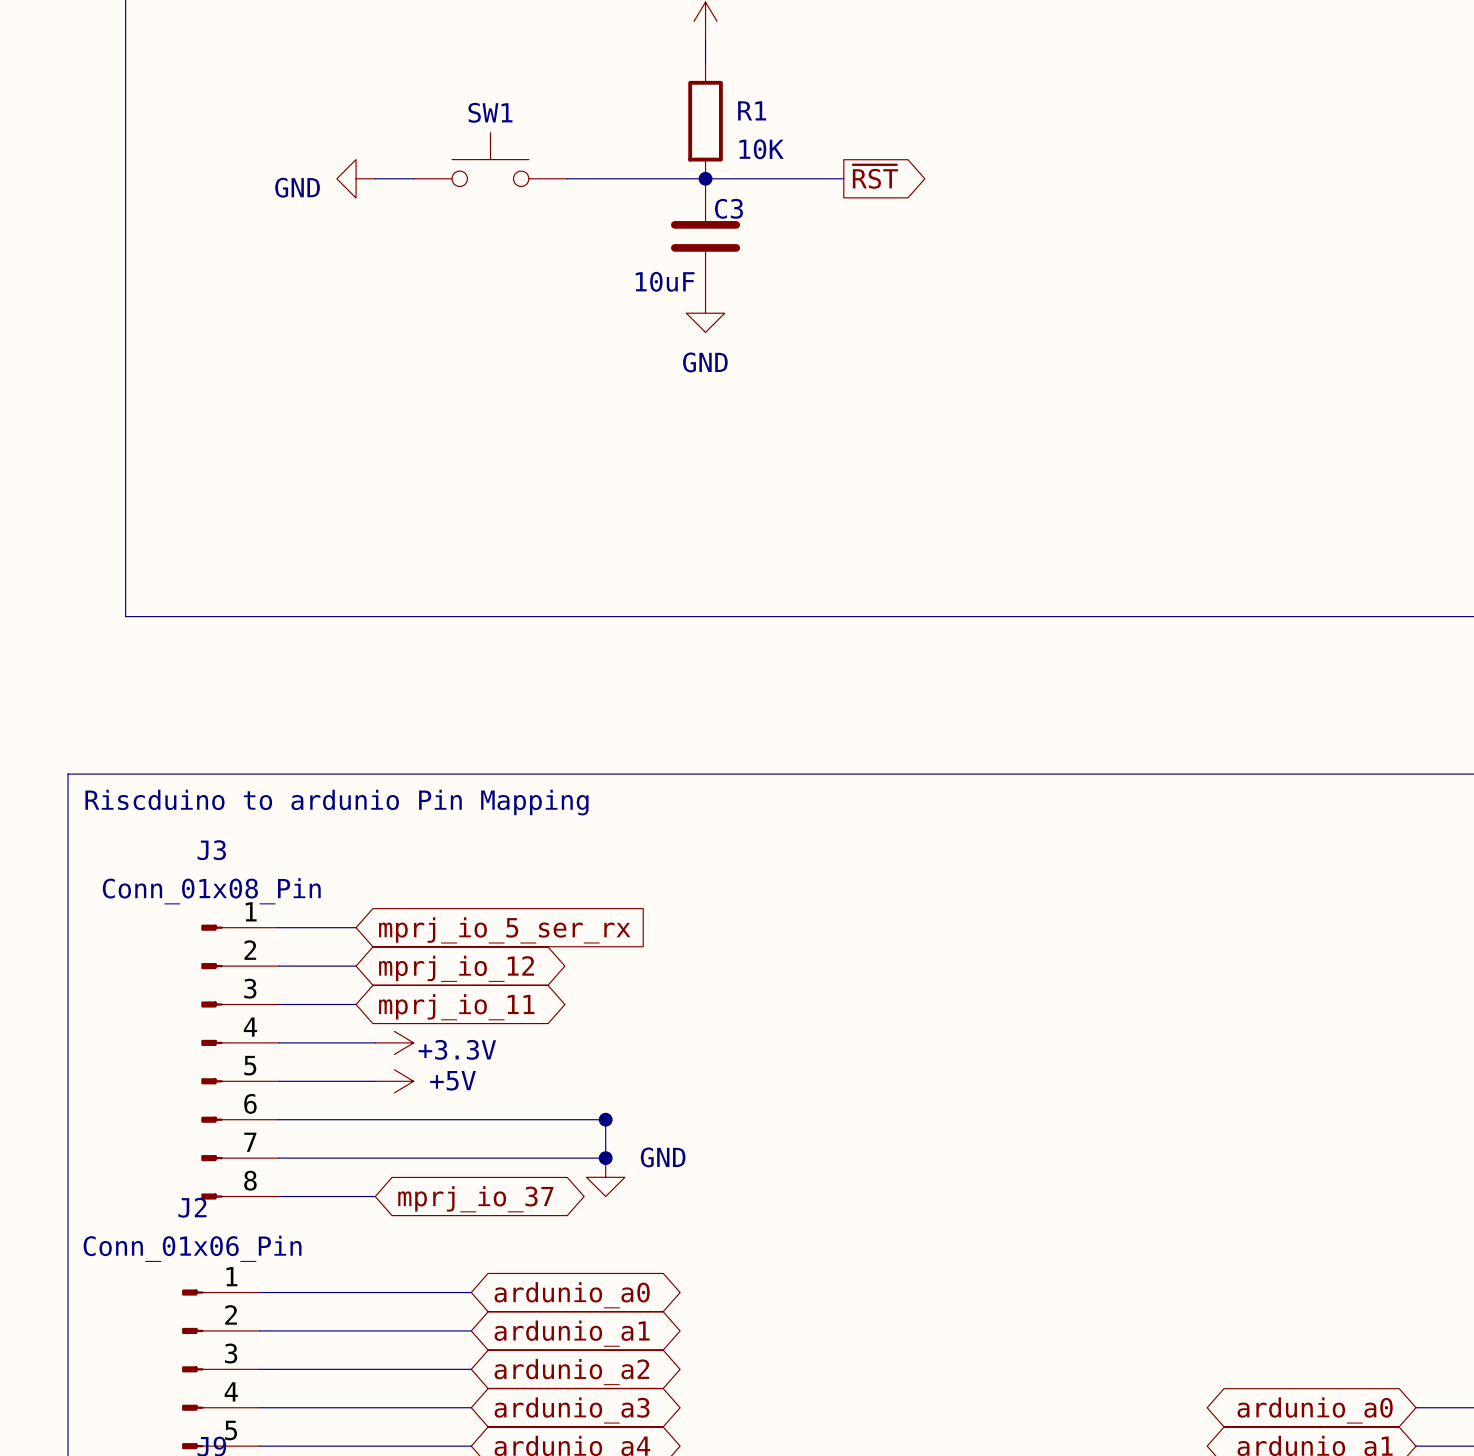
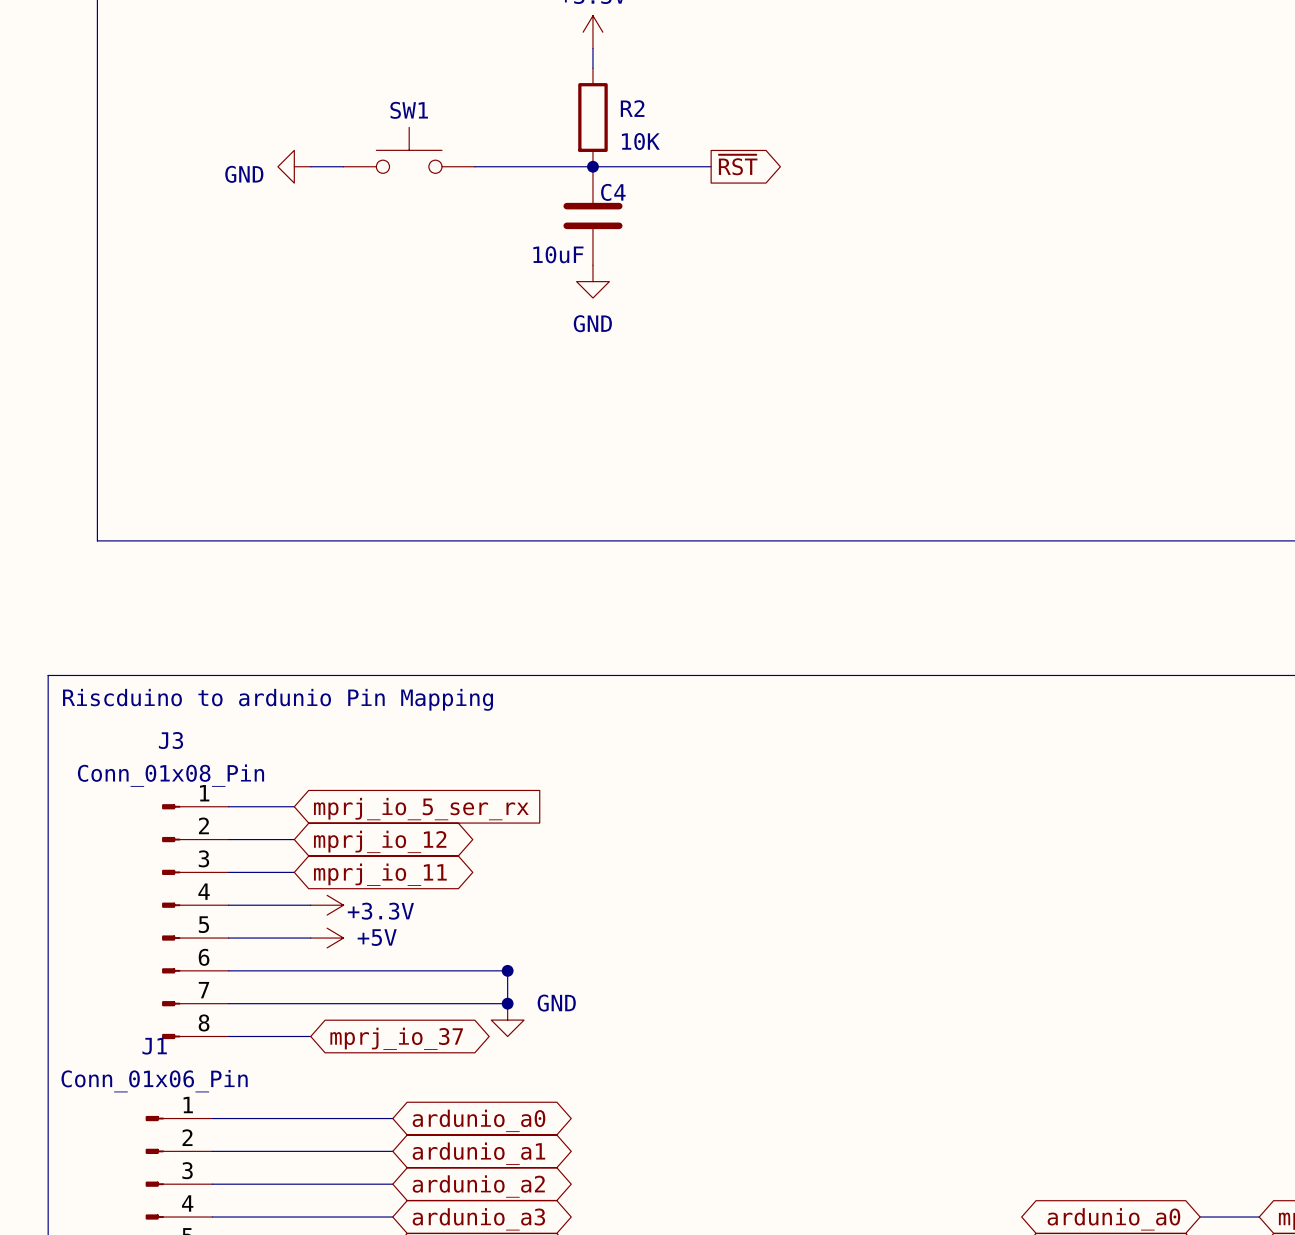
R1 name: R1 (752, 110) -> R2 (632, 108)
C3 name: C3 (728, 208) -> C4 (613, 192)
J2 name: J2 (192, 1207) -> J1 (154, 1046)

